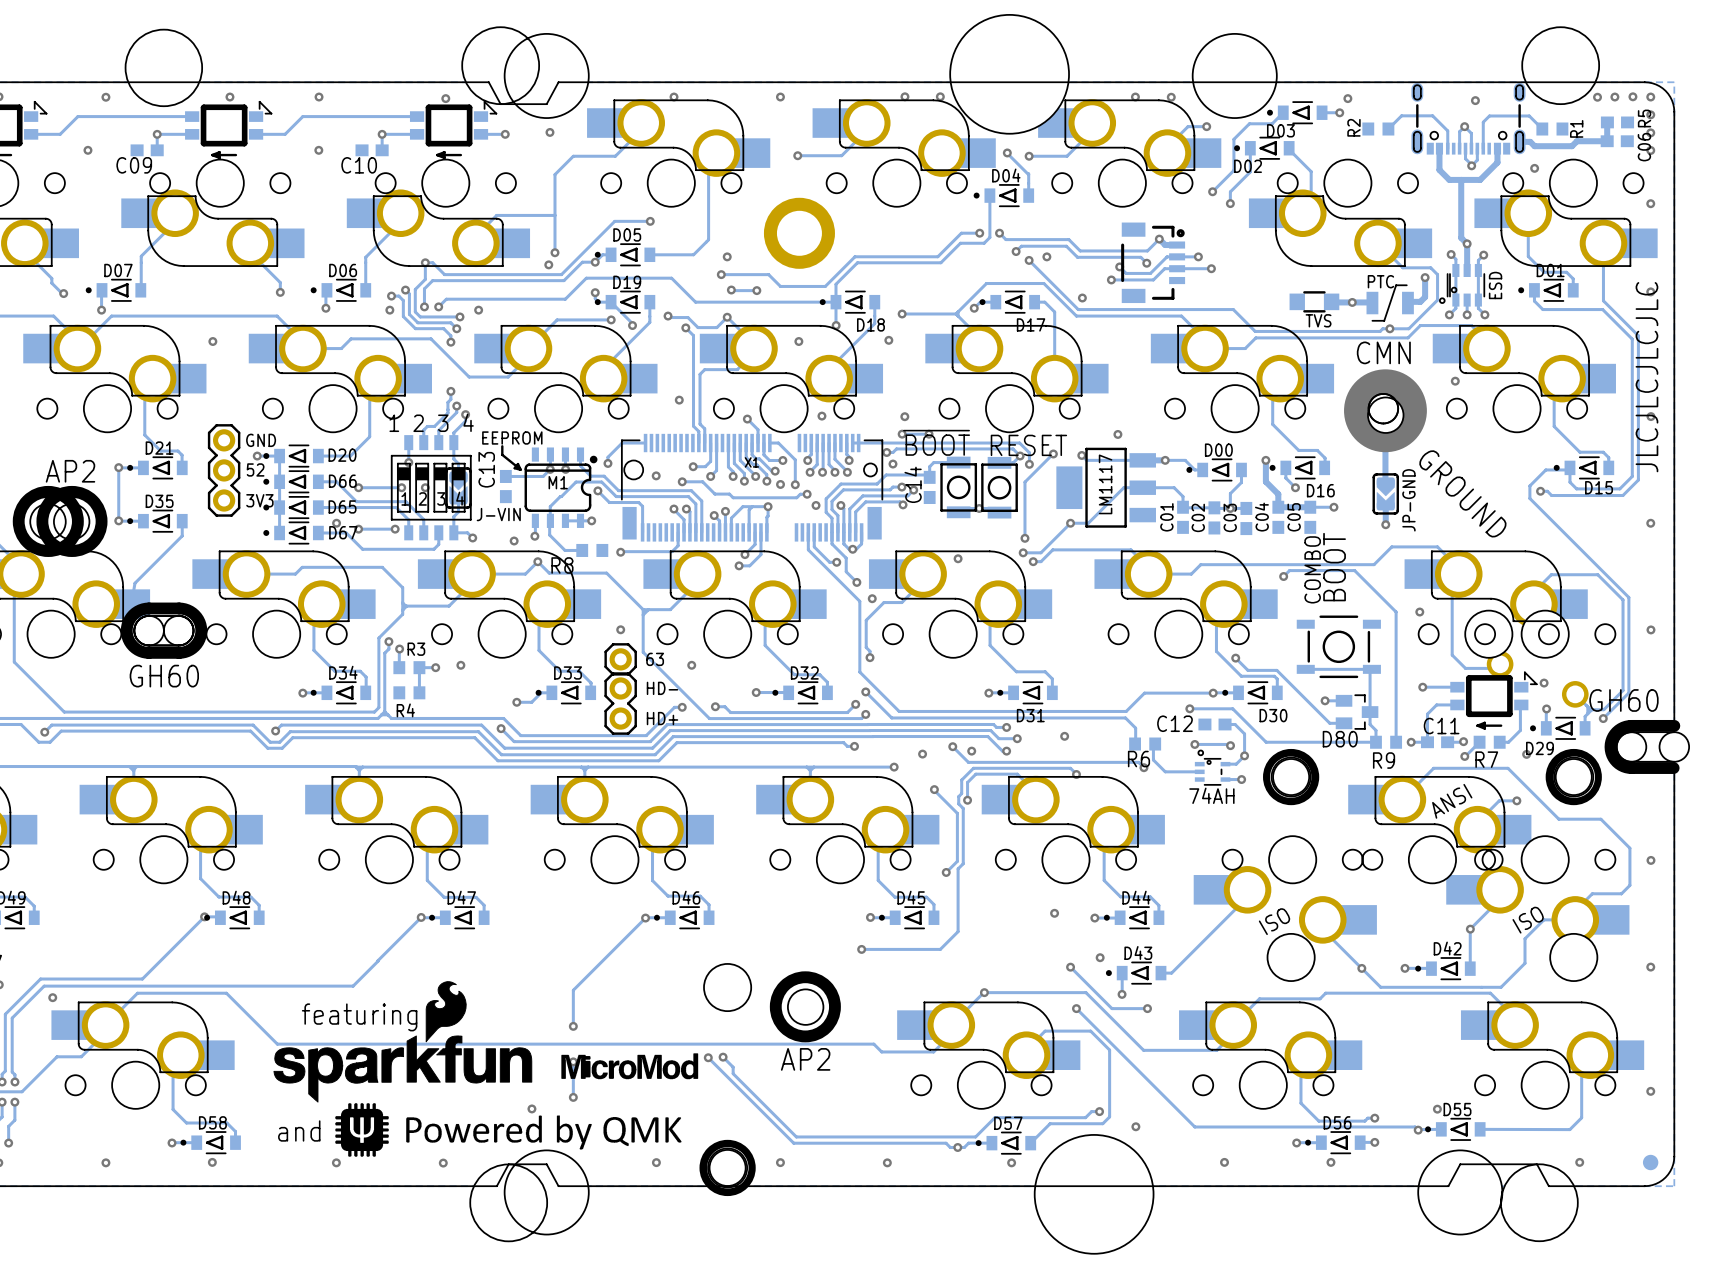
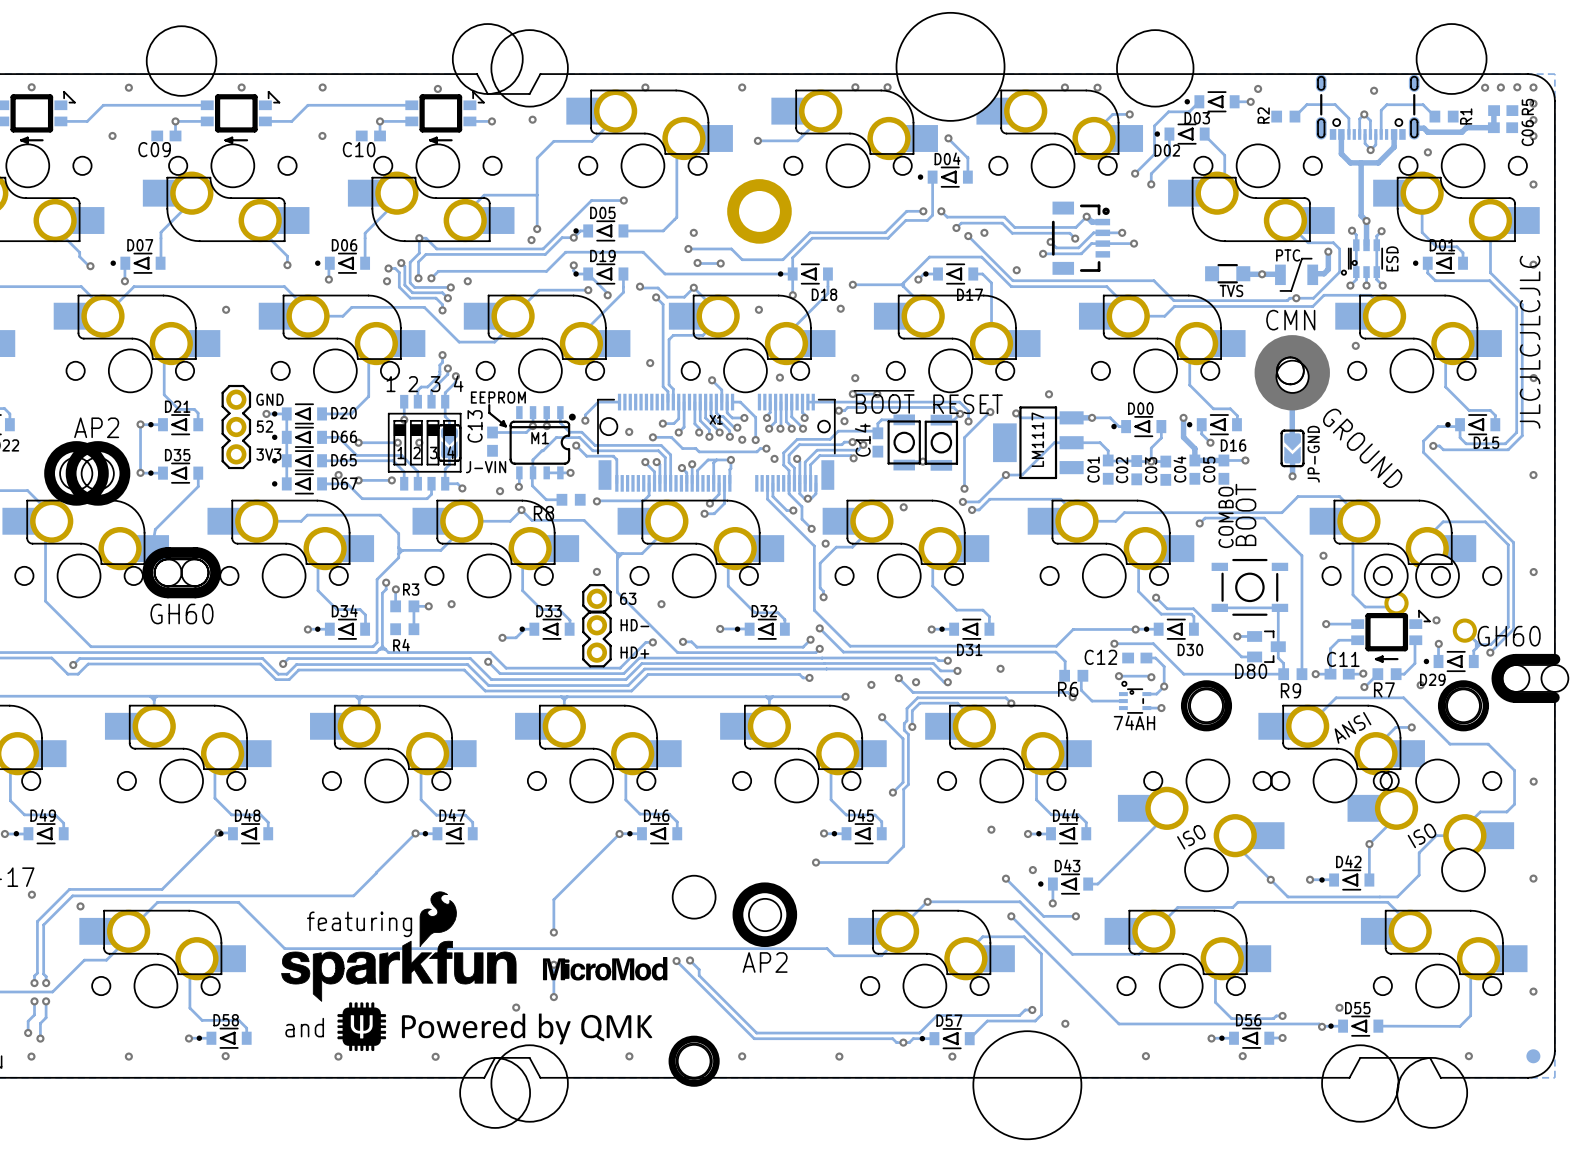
track: (1092, 123) (1092, 130) (1067, 156) (1029, 156) -> none
via: (1029, 156) -> none

